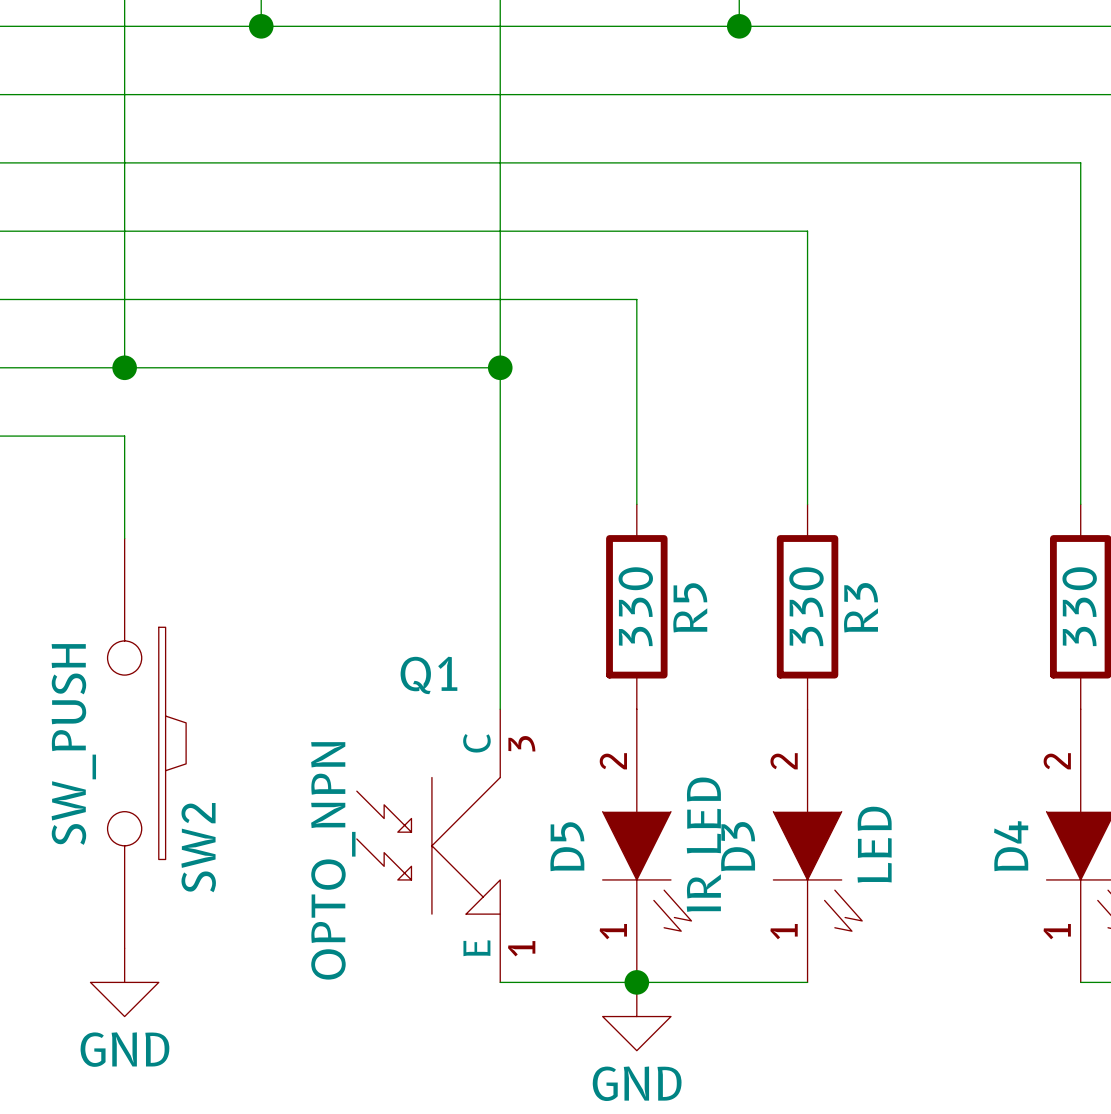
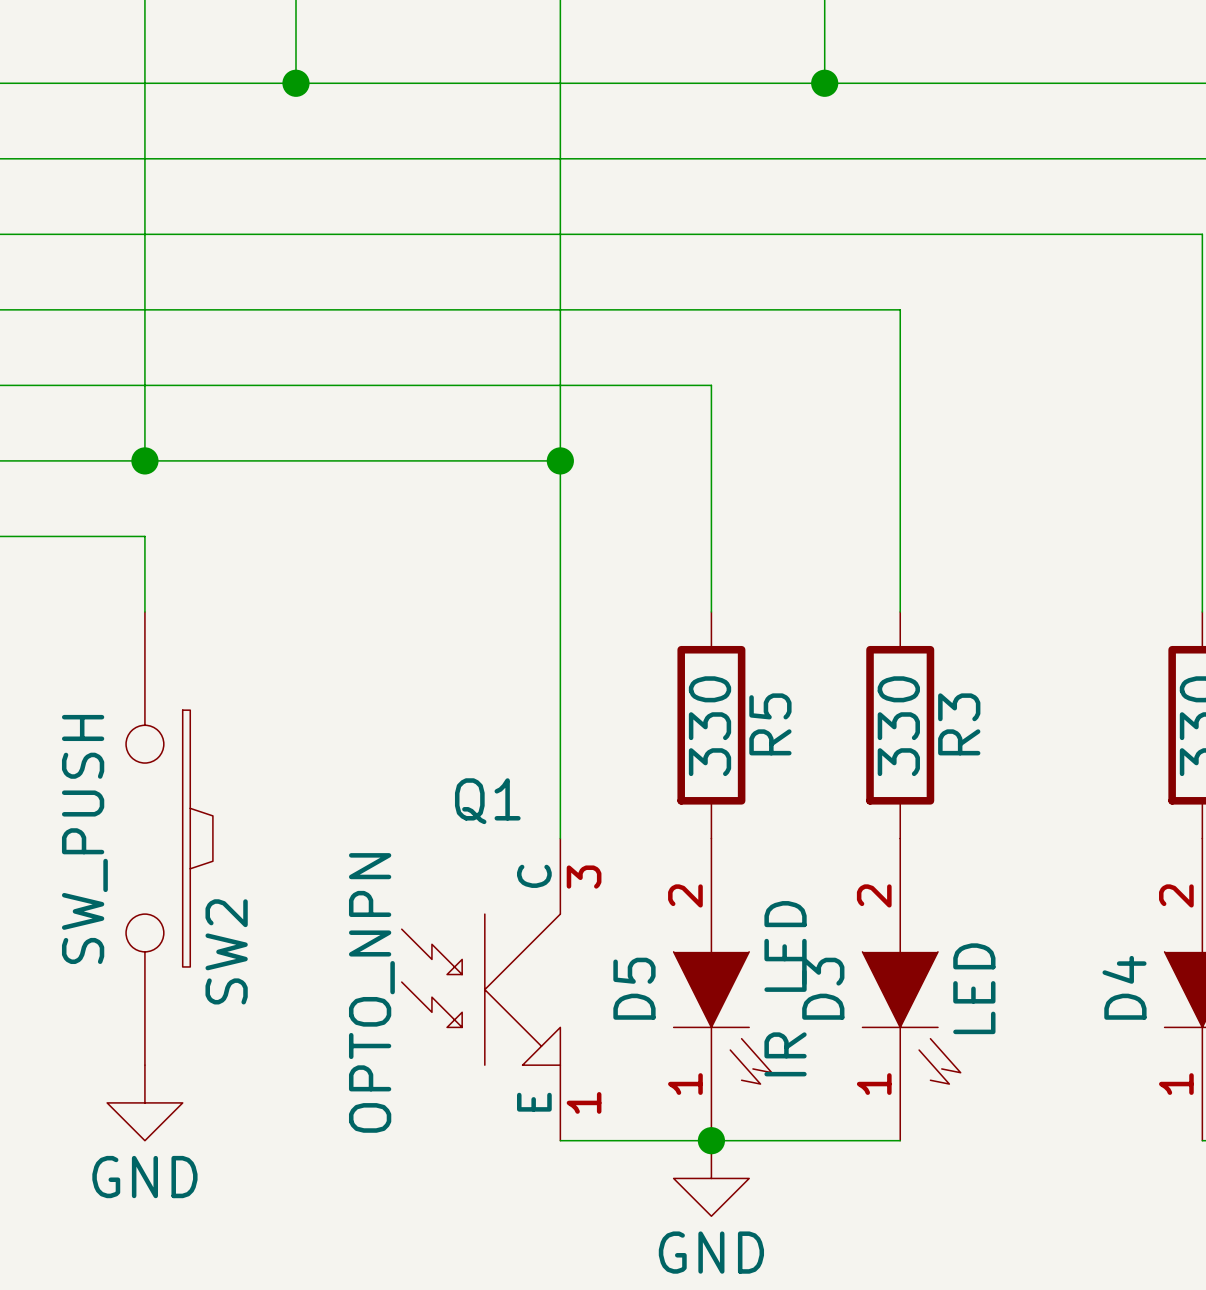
SW2 position: (146, 743) -> (169, 838)
power symbol position: GND (124, 982) -> GND (144, 1102)

